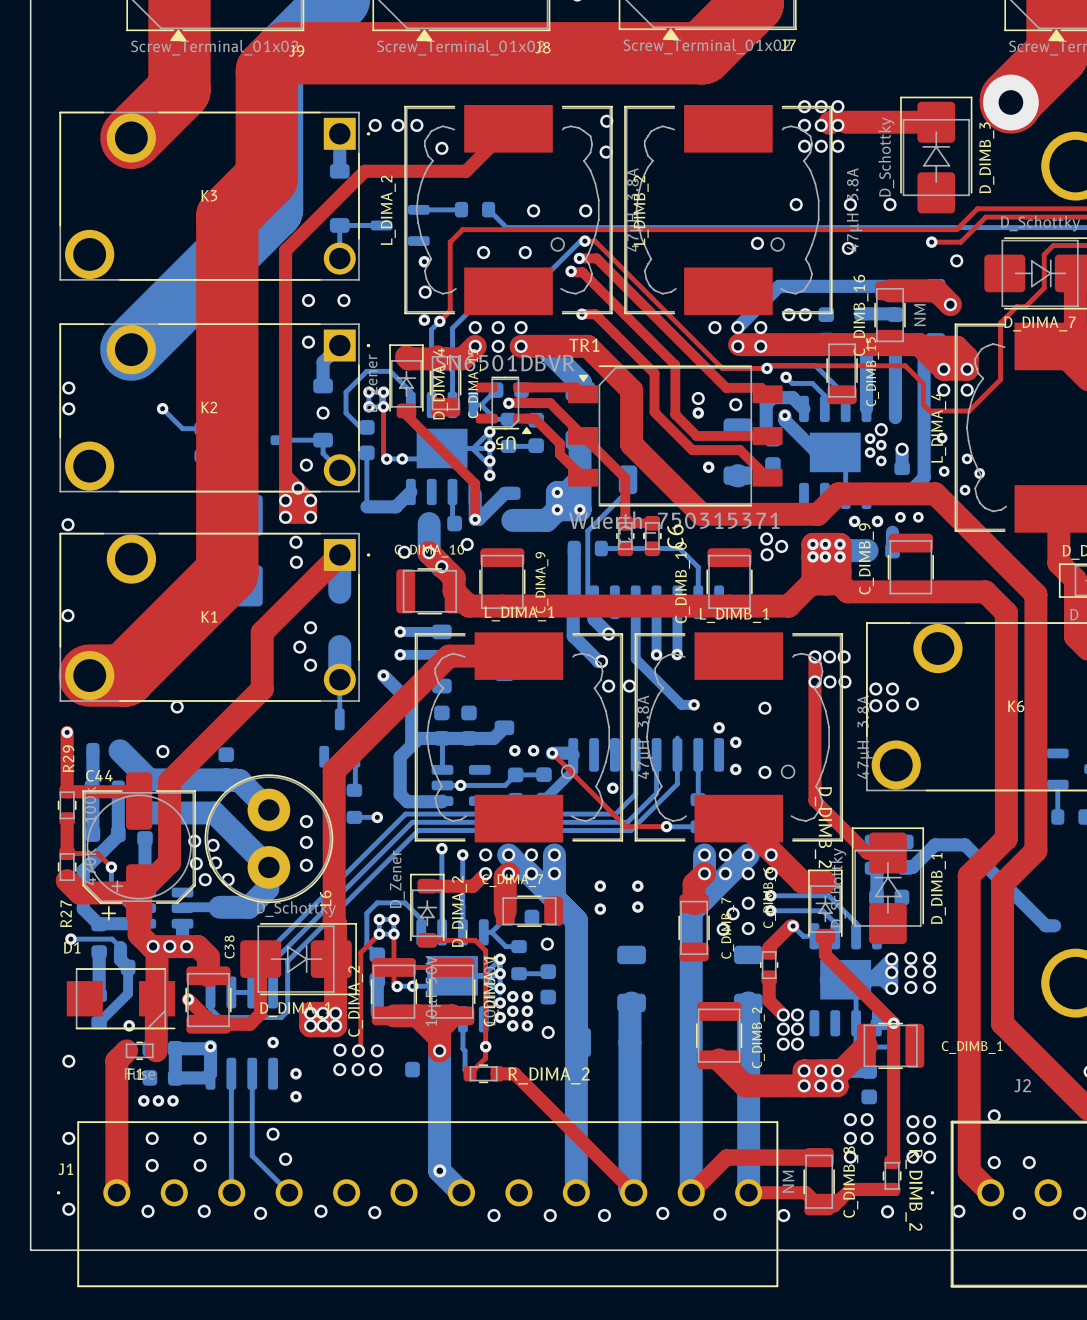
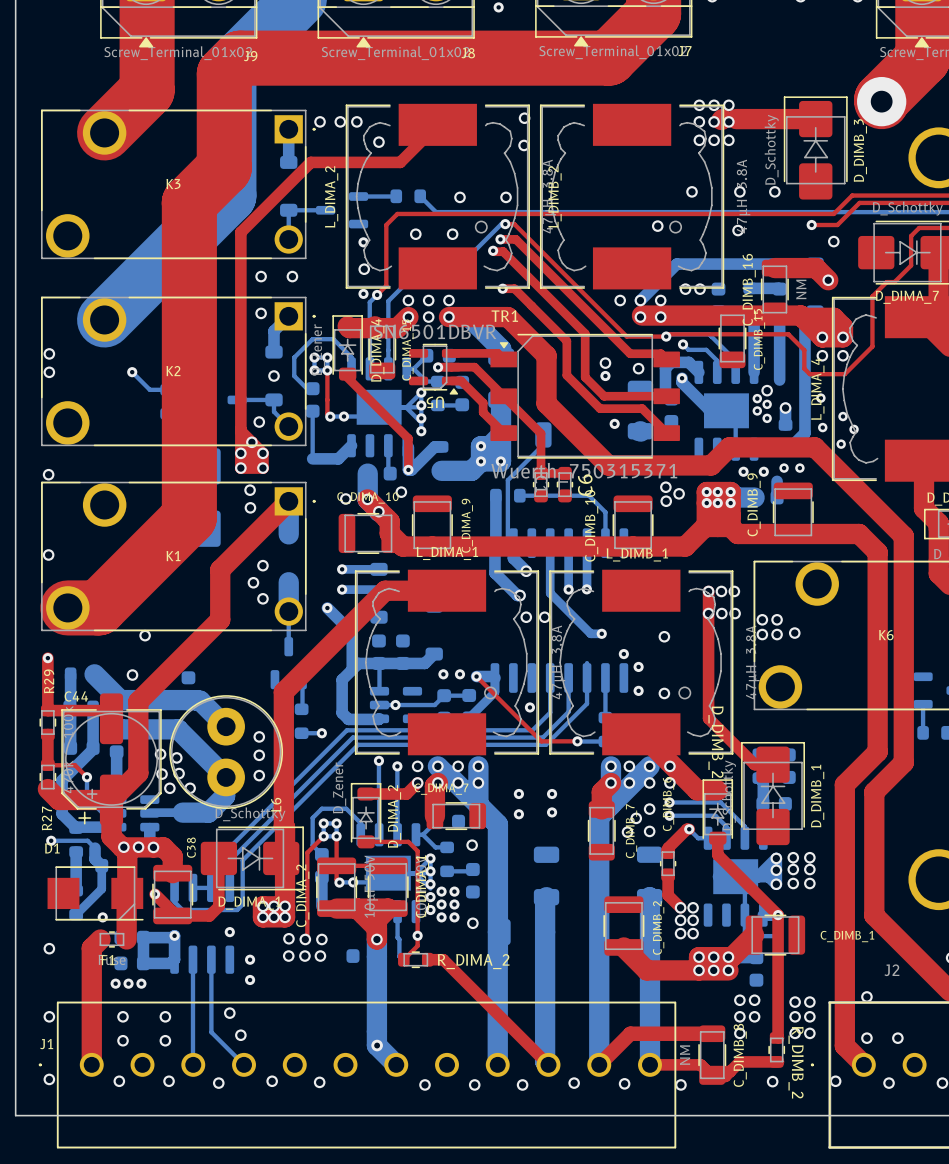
bottom track: (905, 867) (912, 867) (935, 844) (965, 844) (1045, 925) (1054, 925) -> none

